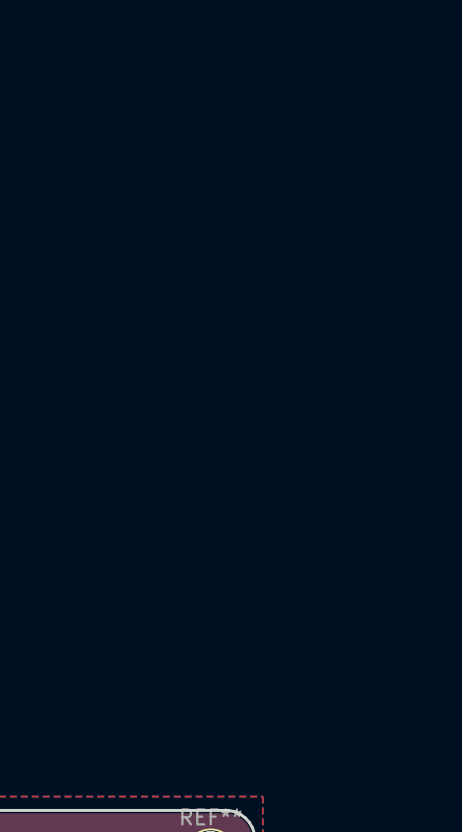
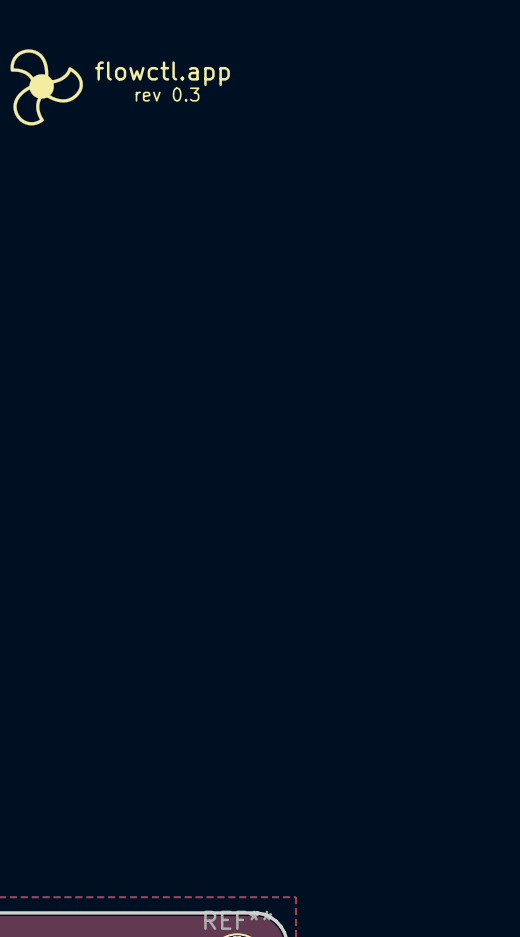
drawing: none -> [10, 49, 83, 126]
text: none -> flowctl.app (162, 73)
text: none -> rev 0.3 (167, 94)

